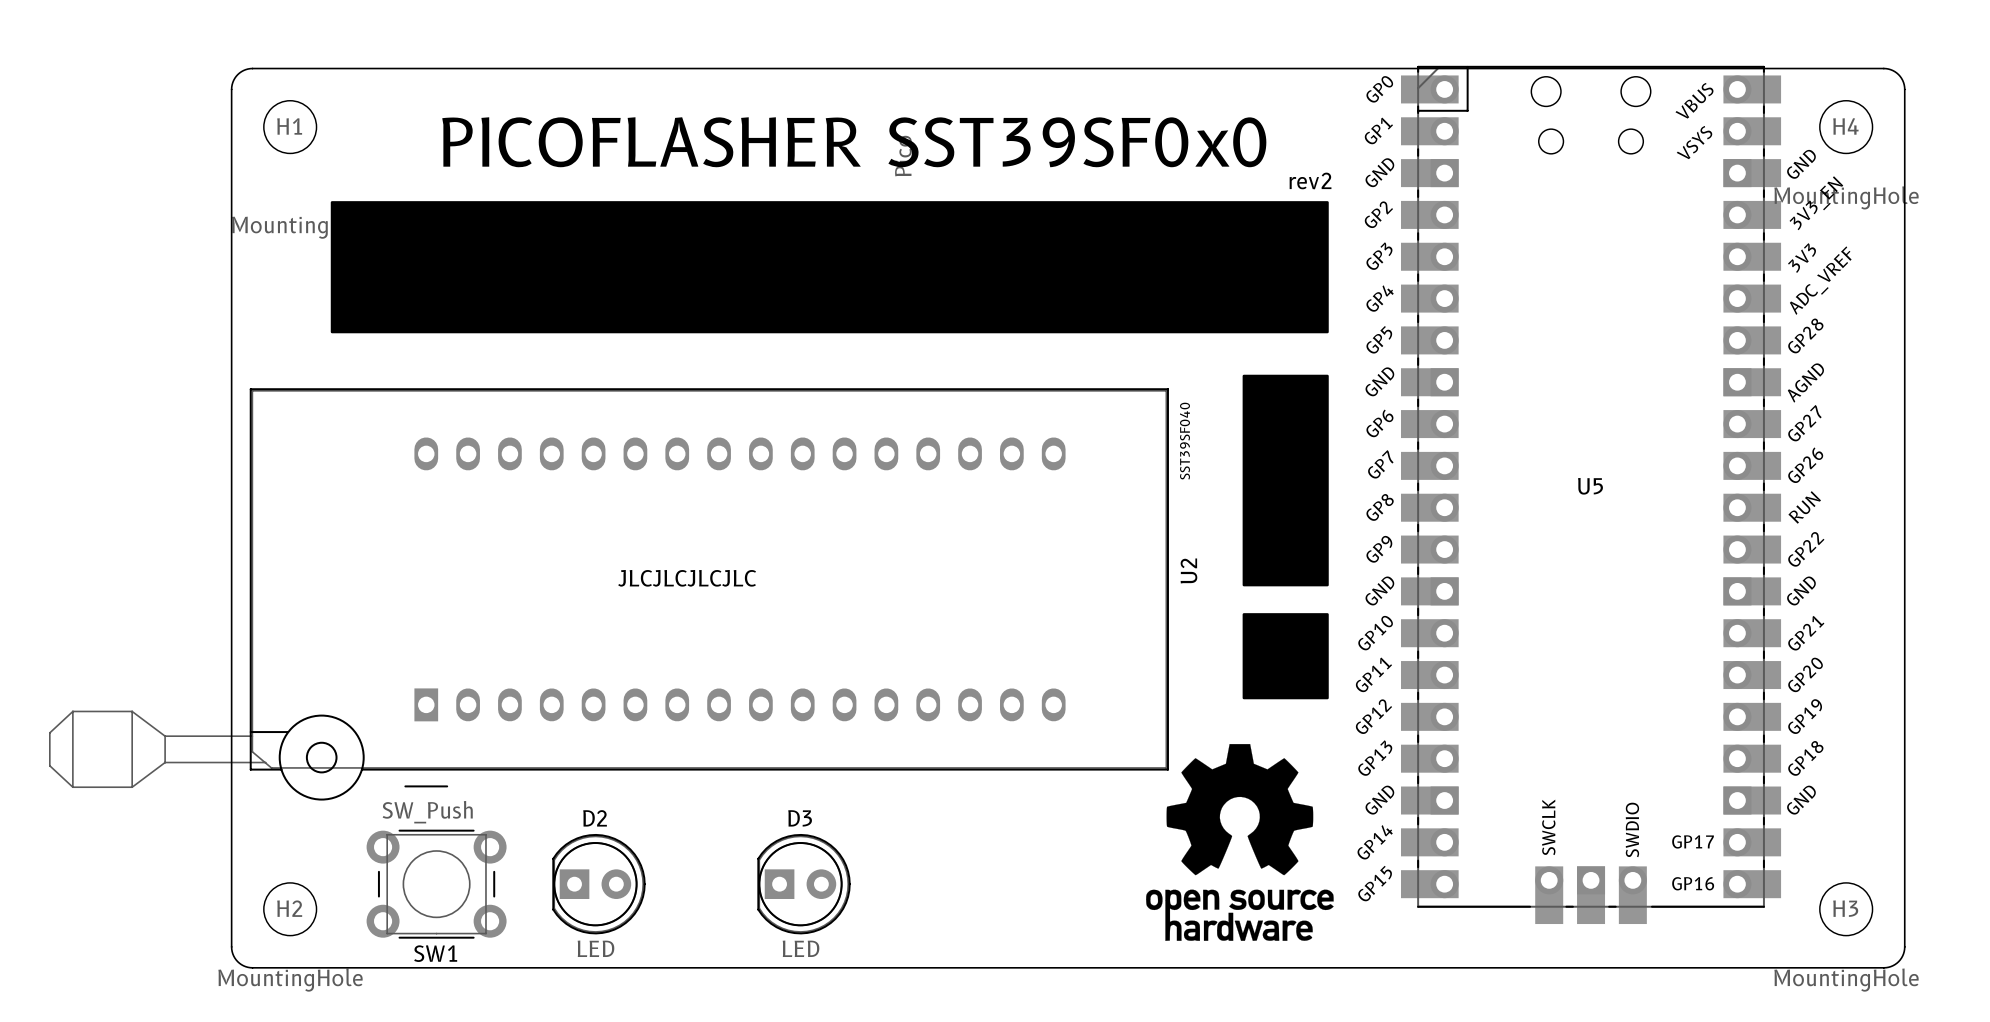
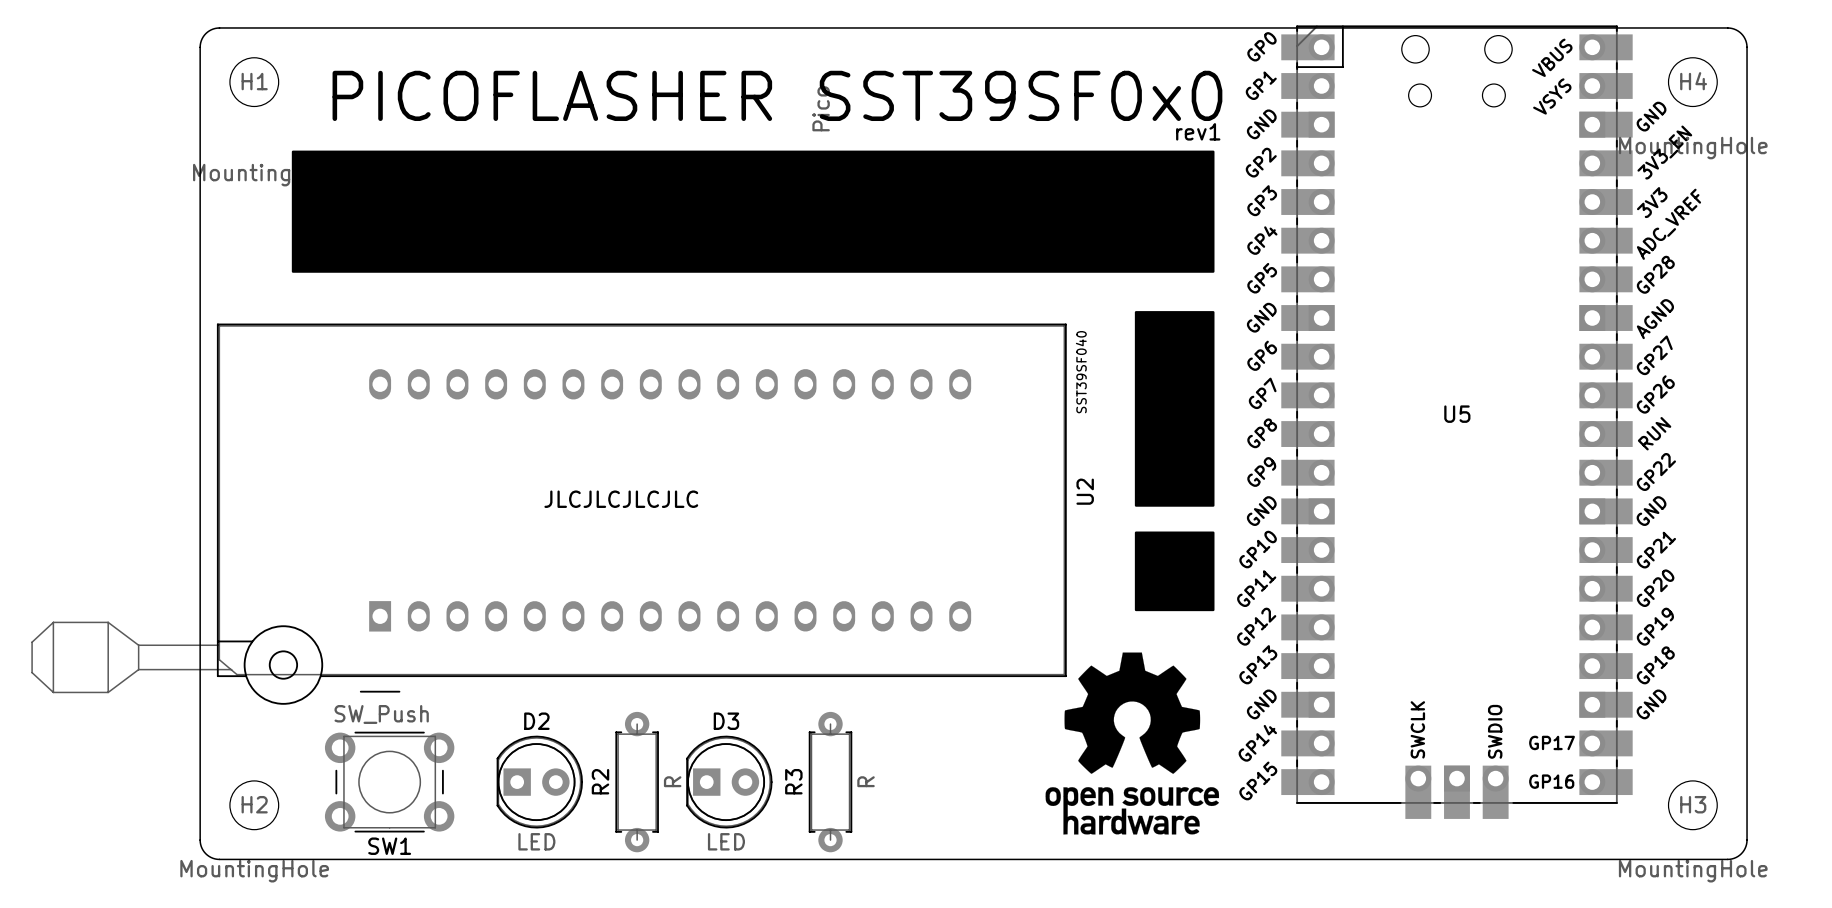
text: rev2 (1310, 180) -> rev1 (1198, 131)
R2: none -> R (637, 782)
R3: none -> R (830, 782)

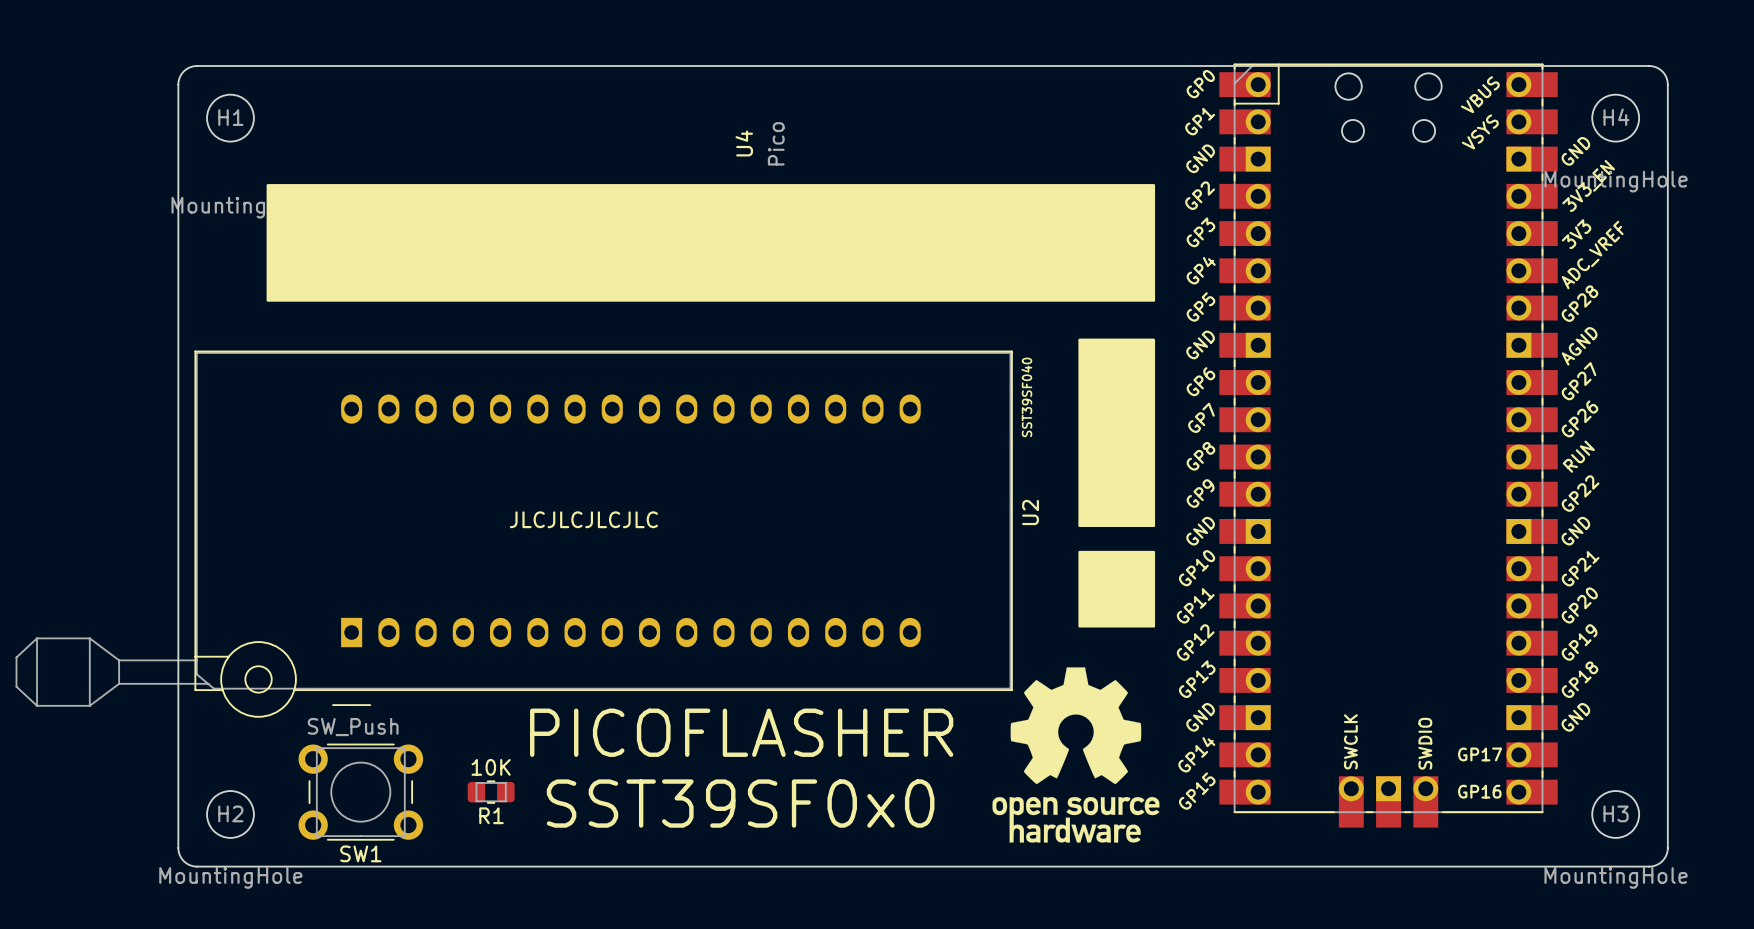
text: PICOFLASHER SST39SF0x0 (777, 95) -> none
text: rev1 (1198, 131) -> none
U5 name: U5 (1457, 414) -> U4 (744, 143)
text: none -> PICOFLASHER (741, 732)
R1: none -> 10K (491, 792)
D2: LED (539, 782) -> none
R2: R (637, 782) -> none
D3: LED (729, 782) -> none
R3: R (830, 782) -> none
text: none -> SST39SF0x0 (740, 803)

